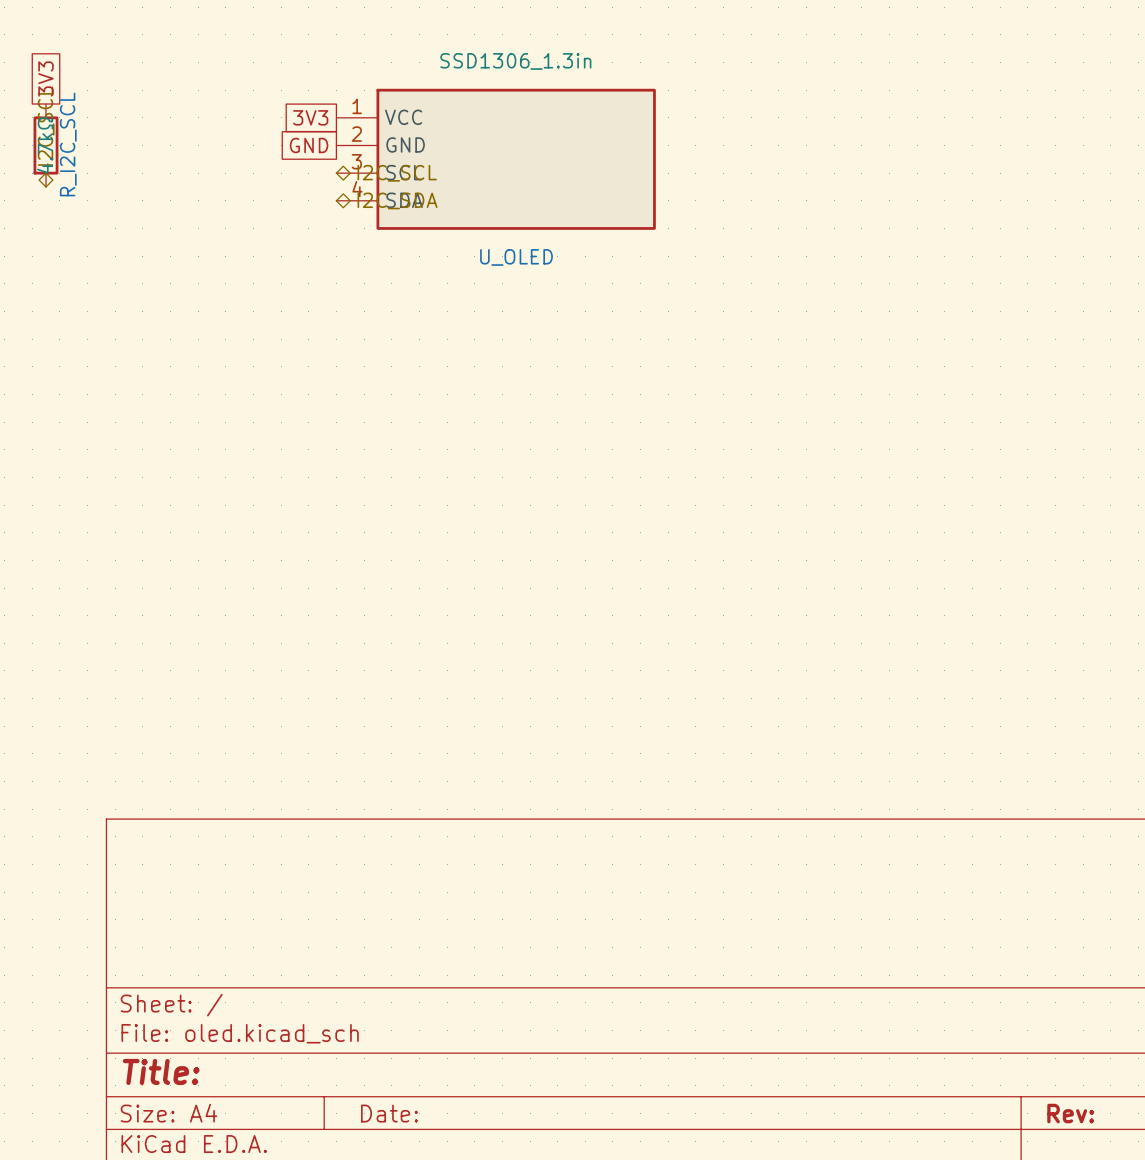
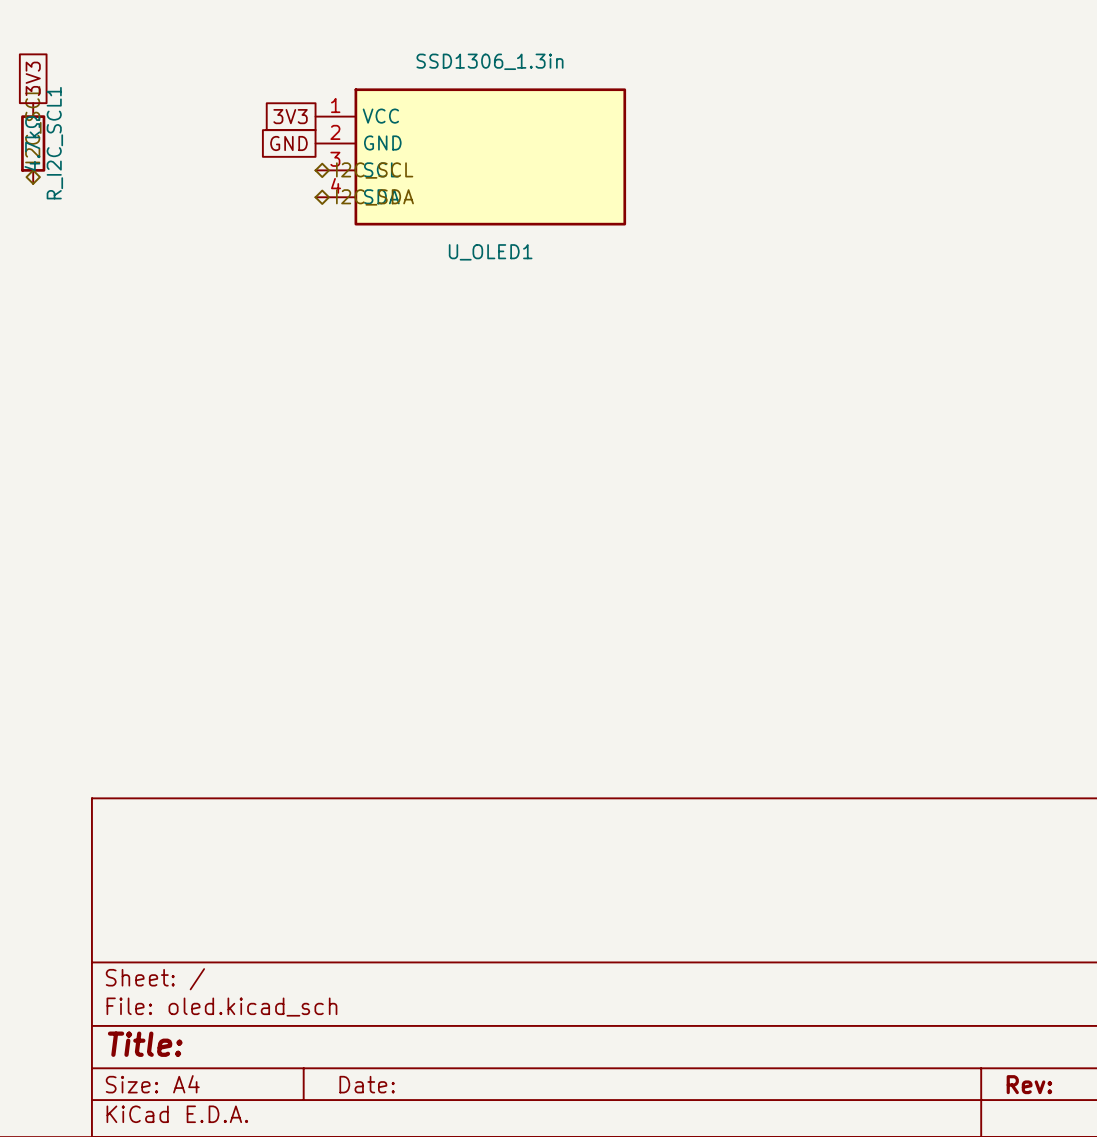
R_I2C_SCL name: R_I2C_SCL (68, 144) -> R_I2C_SCL1 (54, 143)
U_OLED name: U_OLED (516, 257) -> U_OLED1 (490, 252)

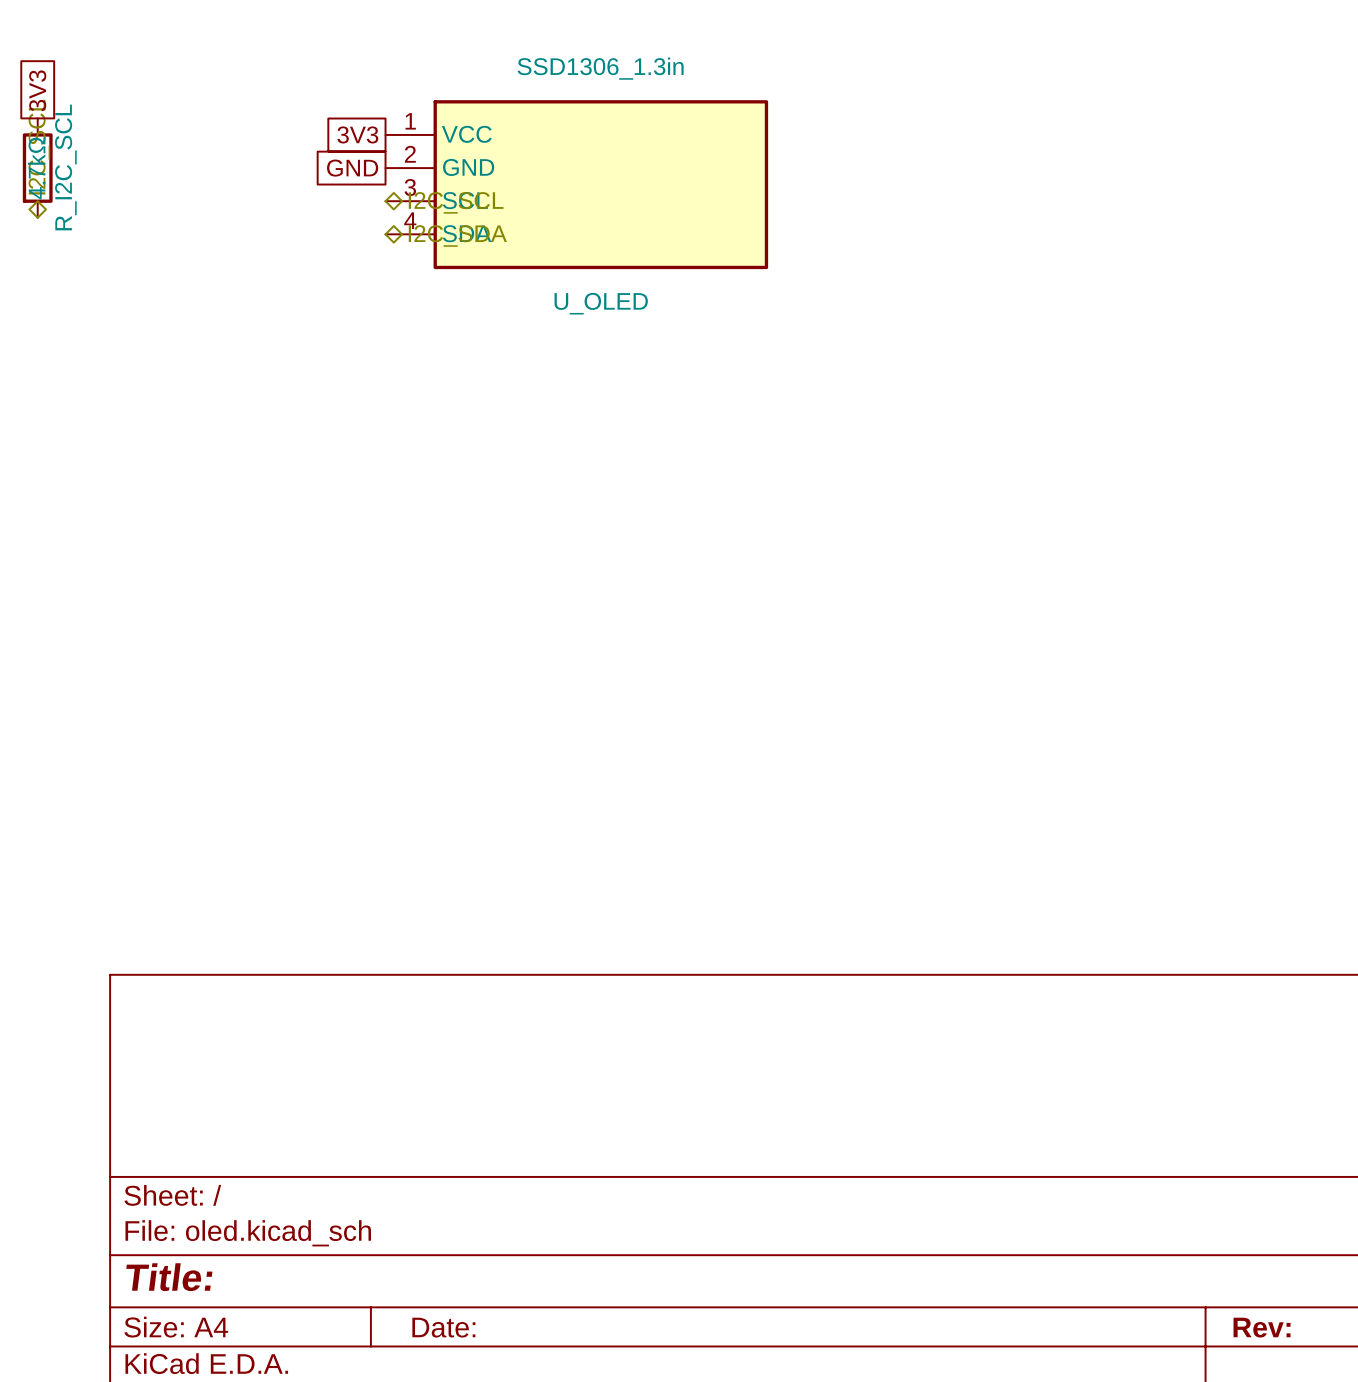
R_I2C_SCL1 name: R_I2C_SCL1 (54, 143) -> R_I2C_SCL (65, 167)
U_OLED1 name: U_OLED1 (490, 252) -> U_OLED (601, 303)

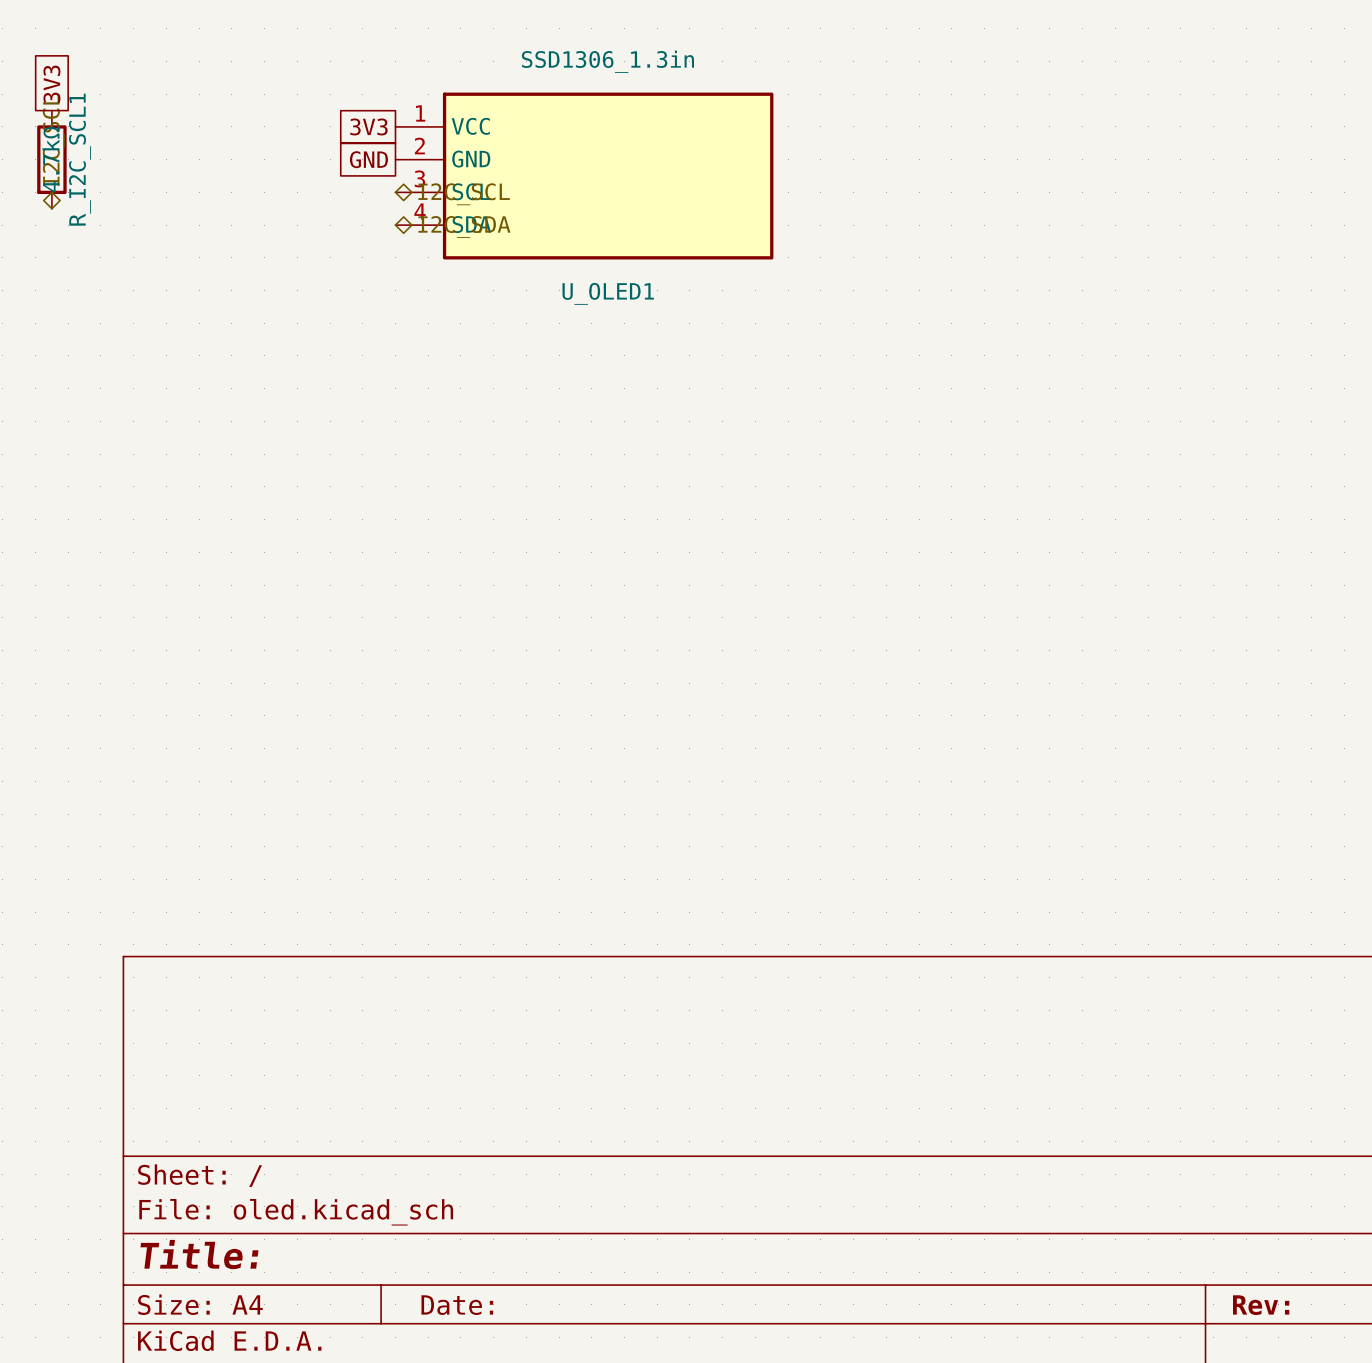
R_I2C_SCL name: R_I2C_SCL (65, 167) -> R_I2C_SCL1 (79, 159)
U_OLED name: U_OLED (601, 303) -> U_OLED1 (608, 293)

